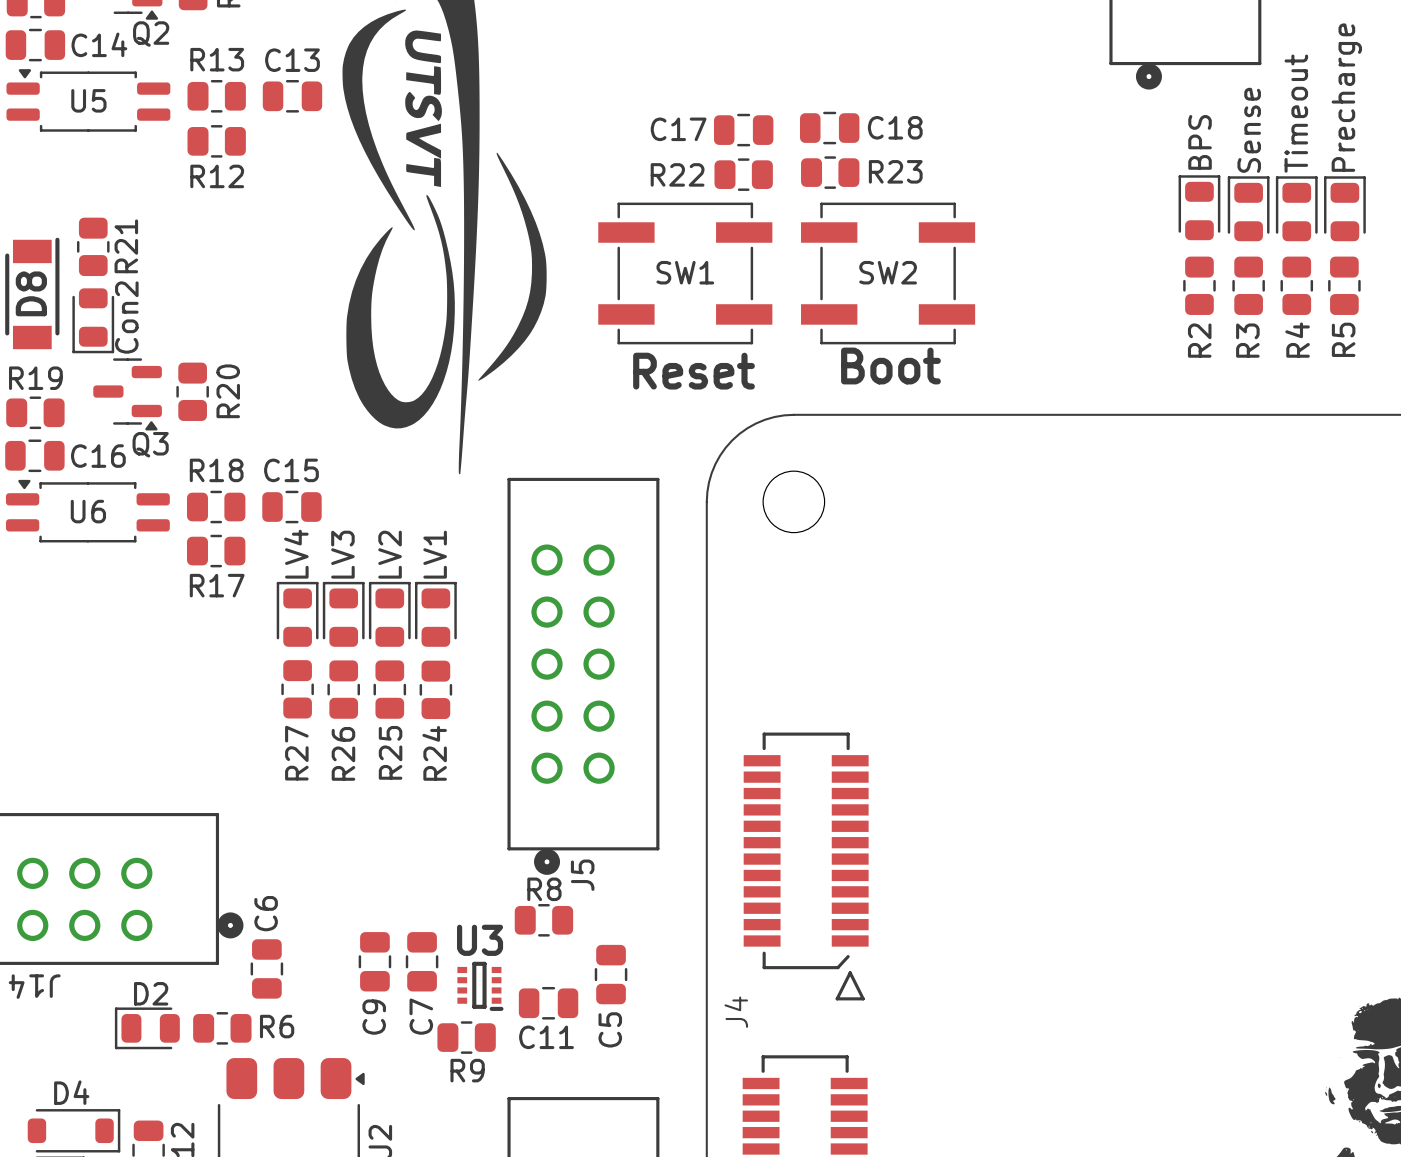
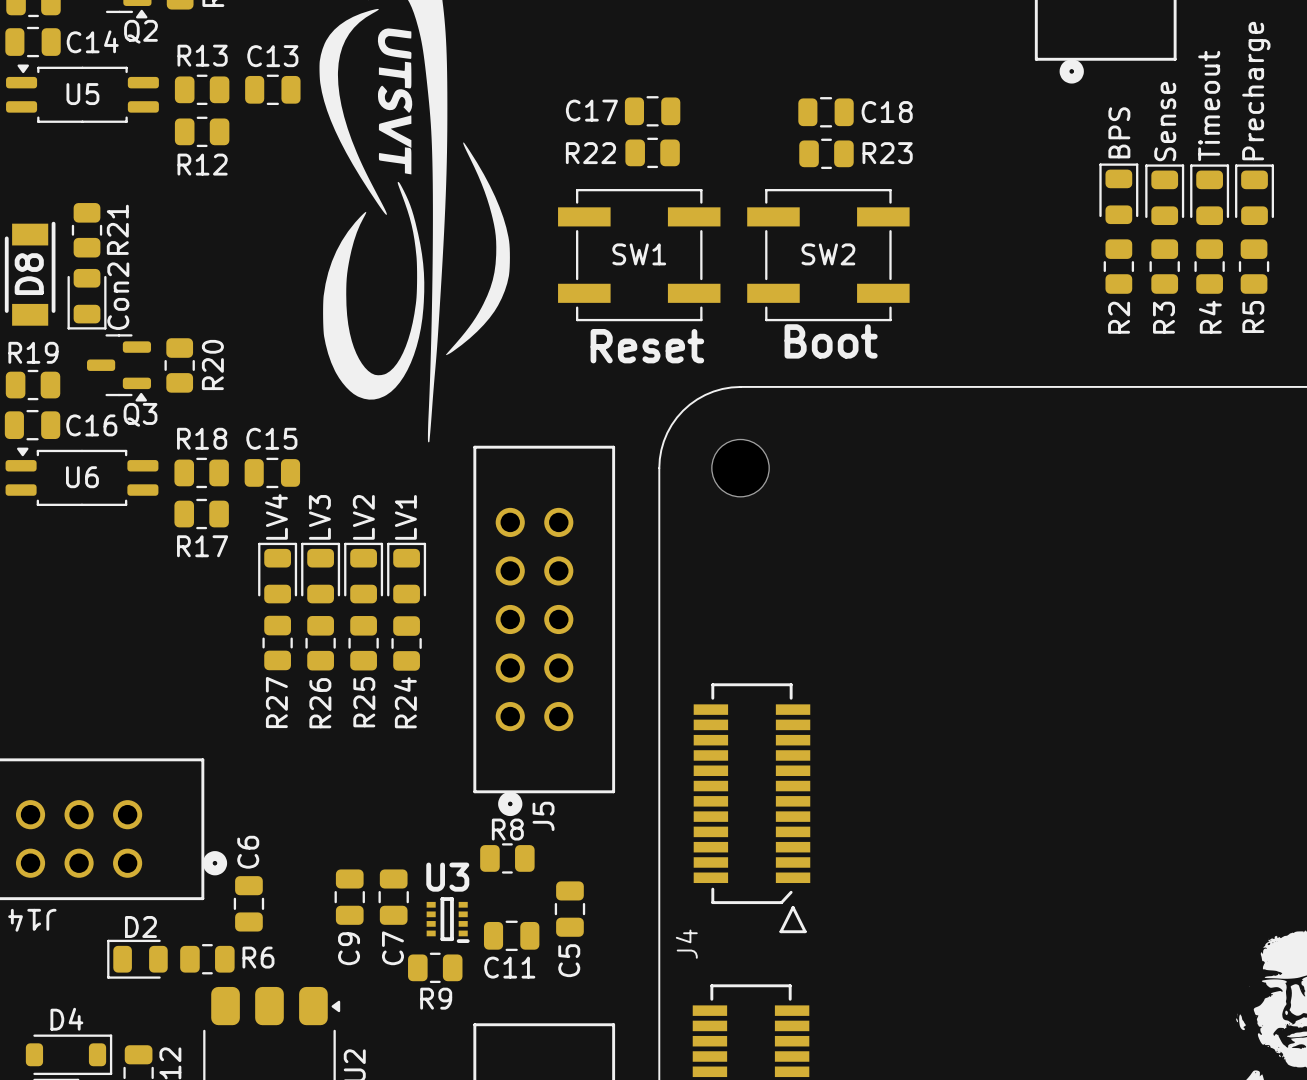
C18 position: (829, 128) -> (826, 112)
C17 position: (743, 130) -> (652, 111)
R23 position: (830, 172) -> (826, 153)
R22 position: (743, 174) -> (652, 152)

